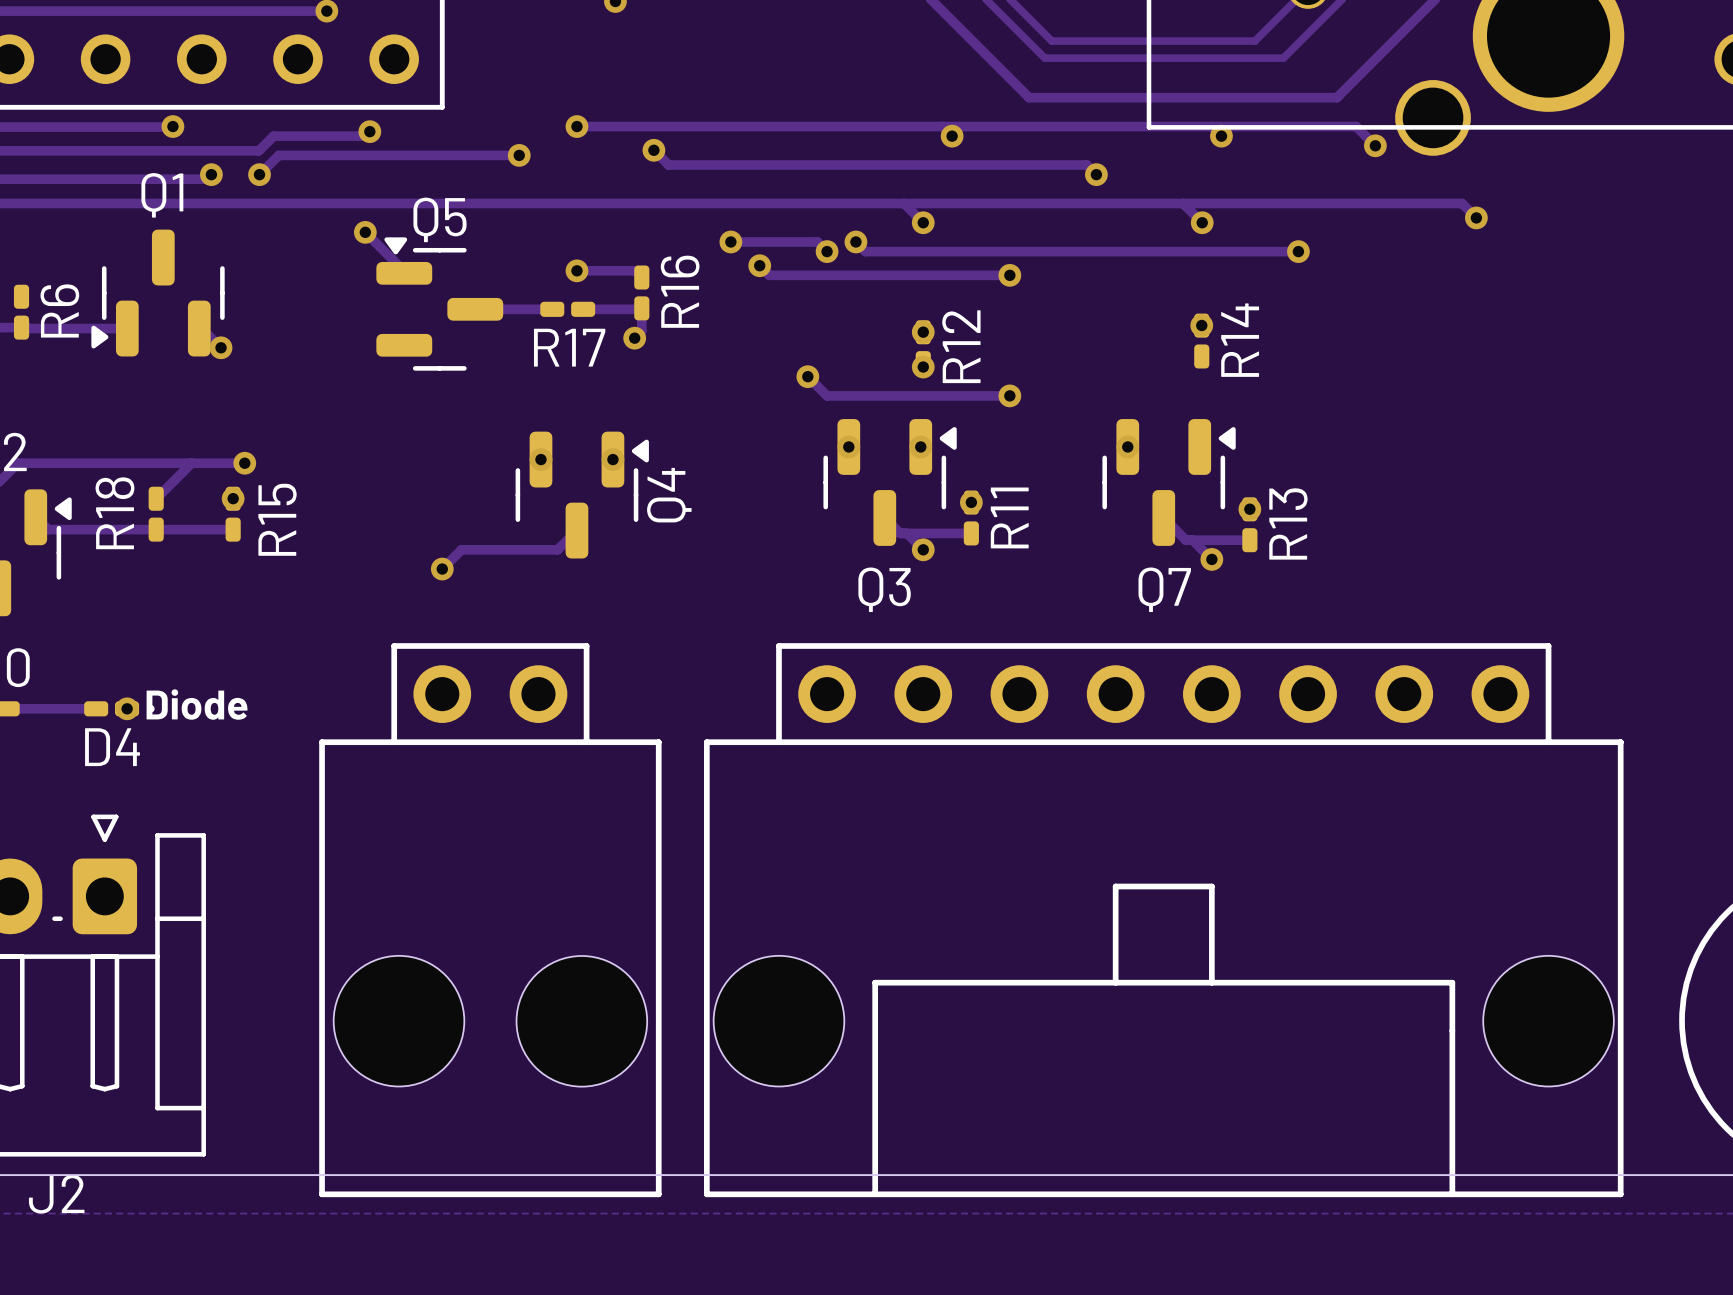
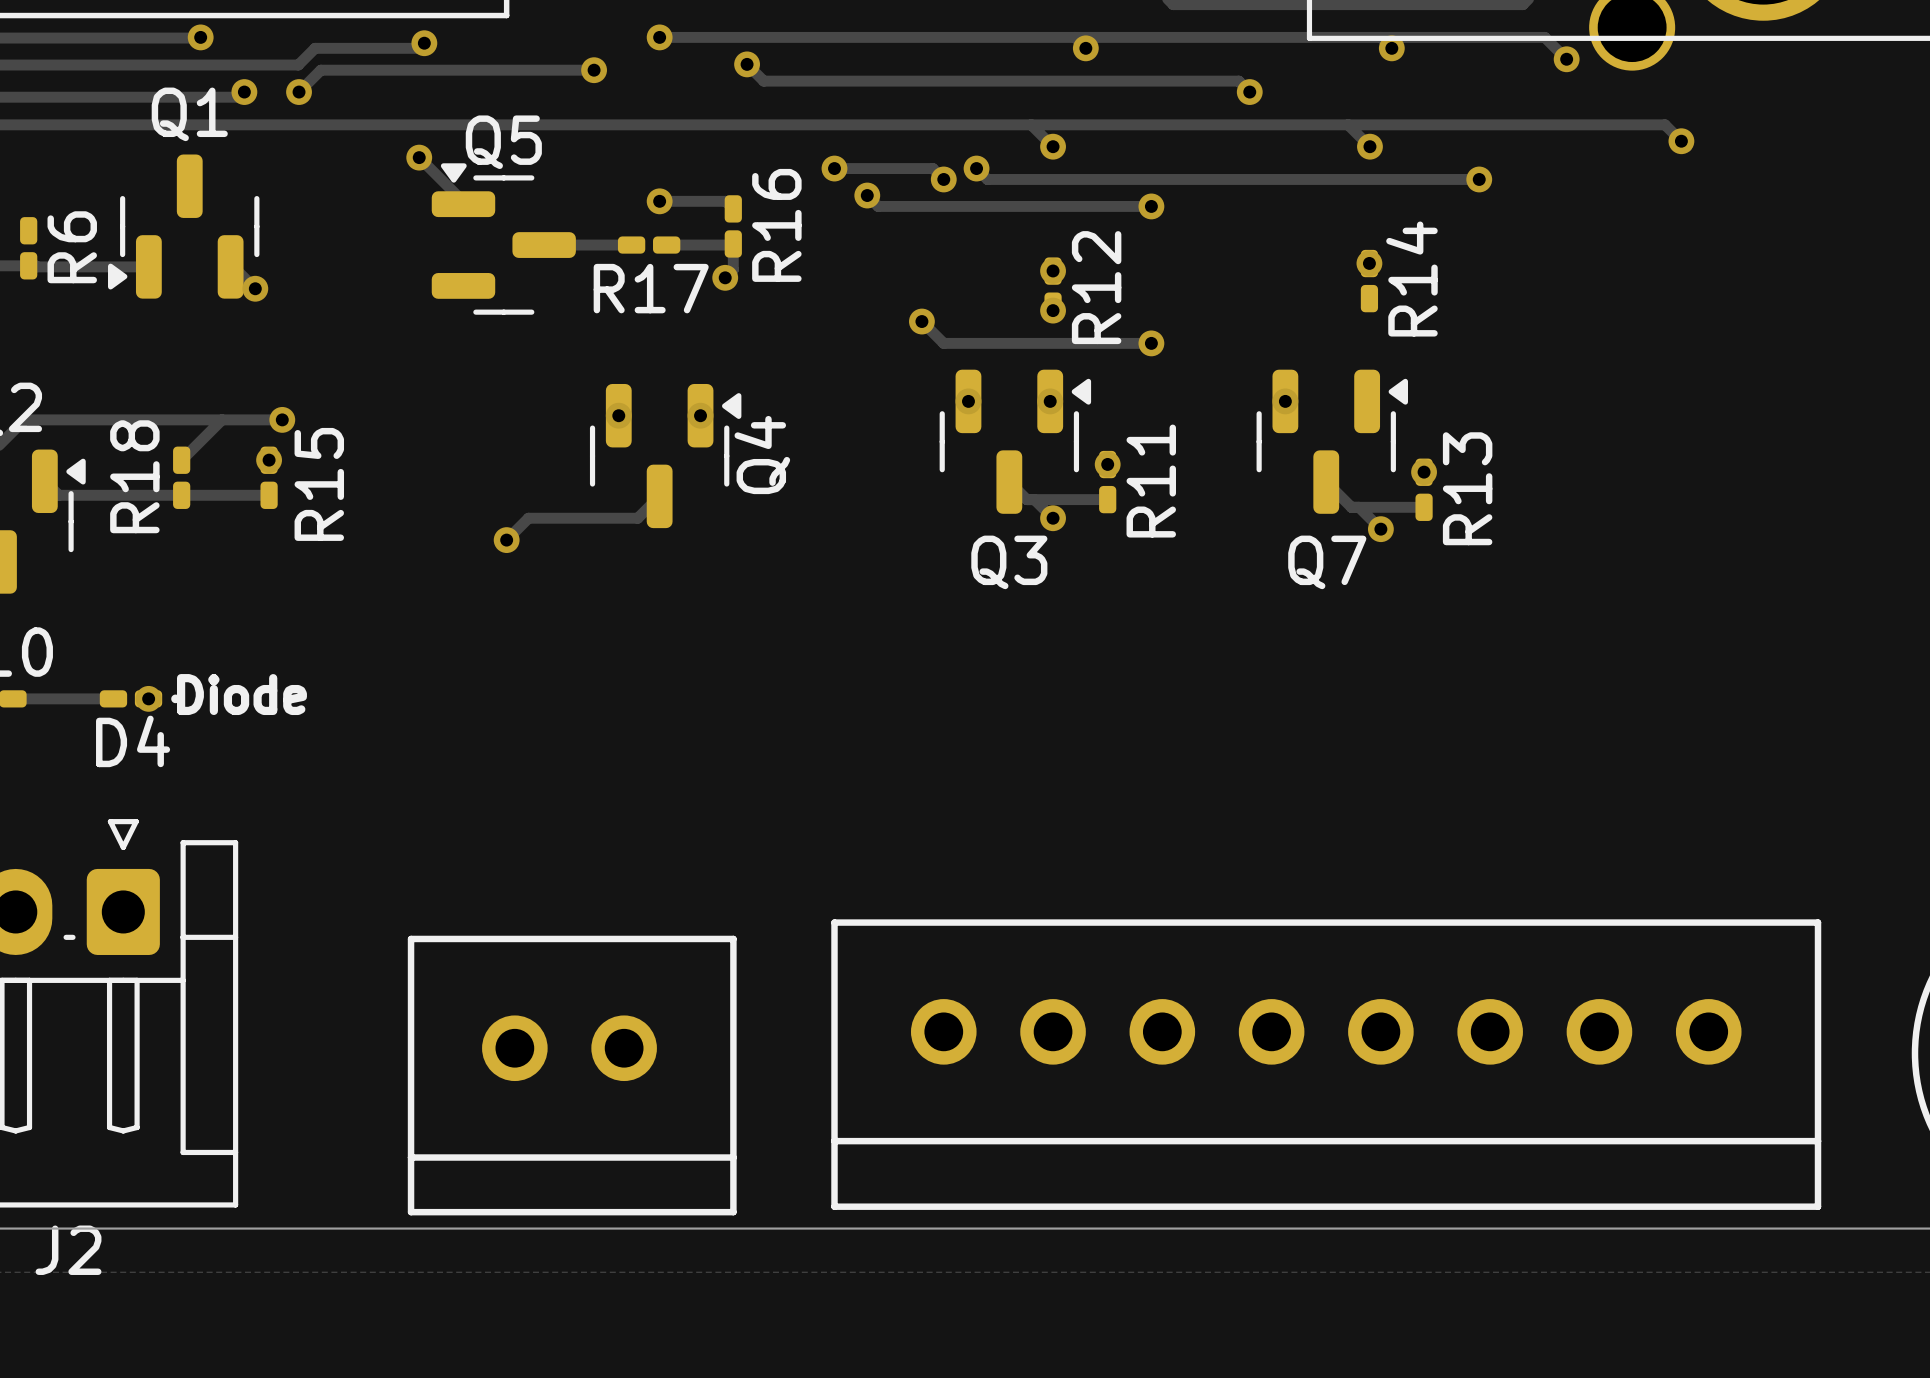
part: (490, 920) -> none
part: (1163, 920) -> none
part: none -> (1326, 1064)
part: none -> (572, 1075)

